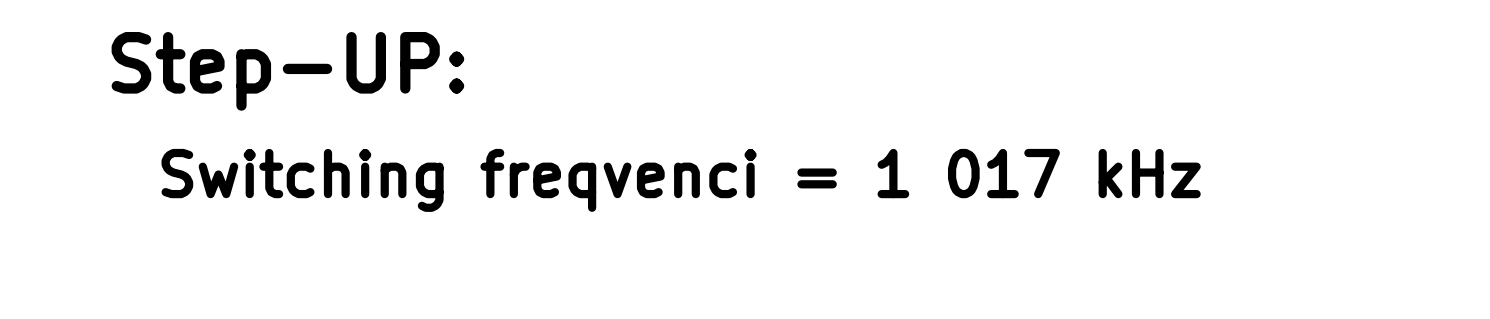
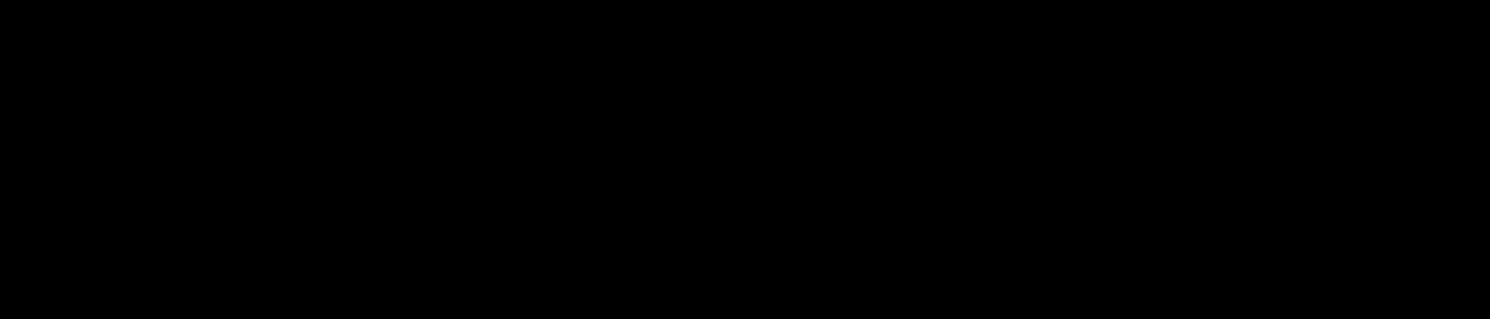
text: Step-UP: (287, 71) -> none
text: Switching freqvenci = 1 017 kHz (681, 180) -> none

